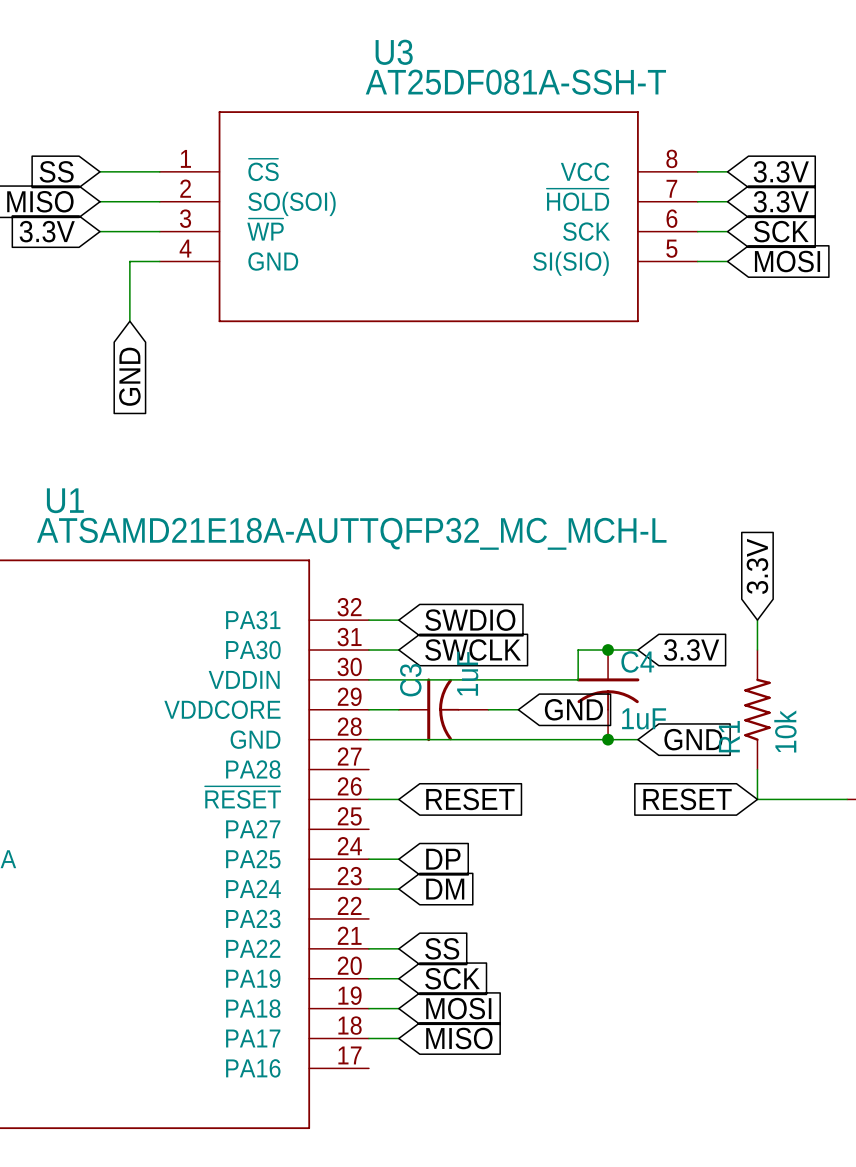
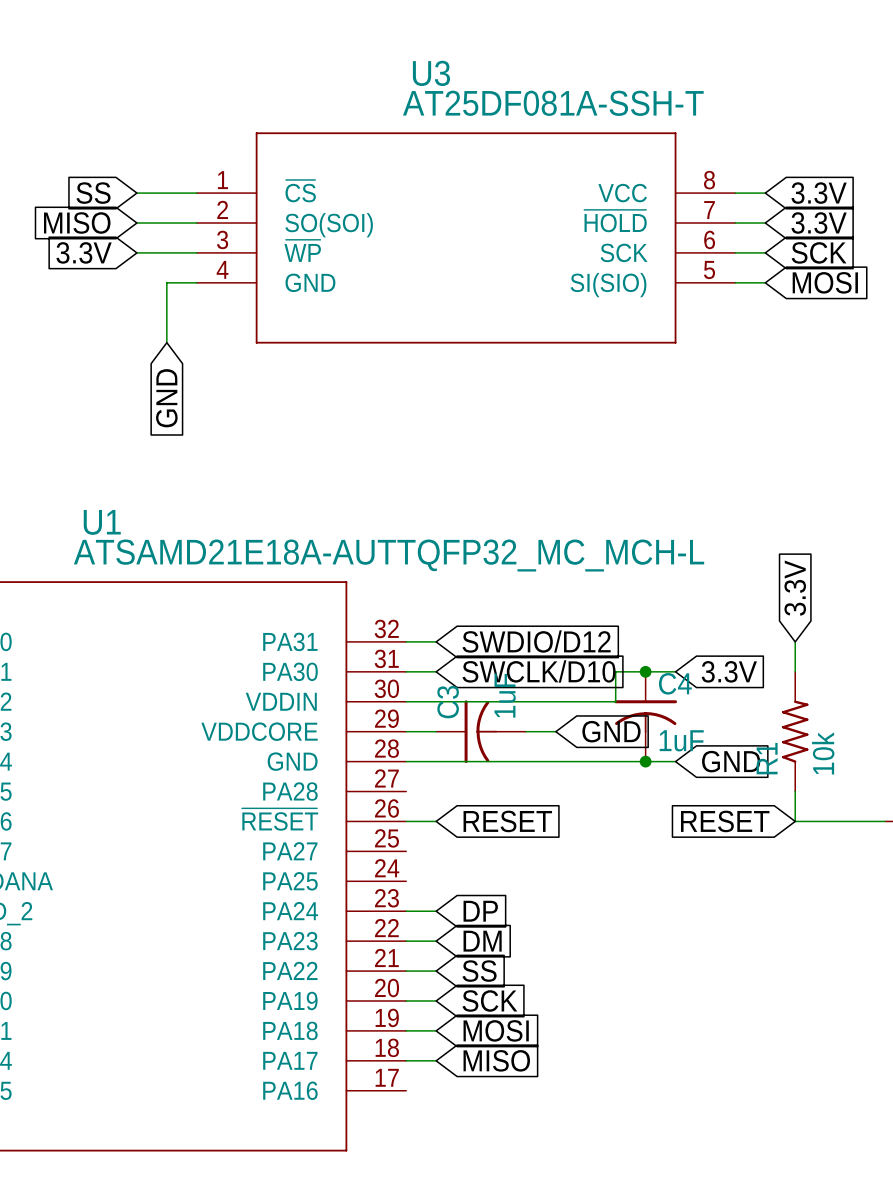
global label: SWDIO (470, 620) -> SWDIO/D12 (536, 641)
global label: SWCLK (473, 650) -> SWCLK/D10 (539, 671)
wire: (368, 859) (398, 859) -> (406, 941) (436, 941)
global label: DP (443, 859) -> none
global label: DM (445, 889) -> DP (480, 911)
global label: none -> DM (482, 941)

